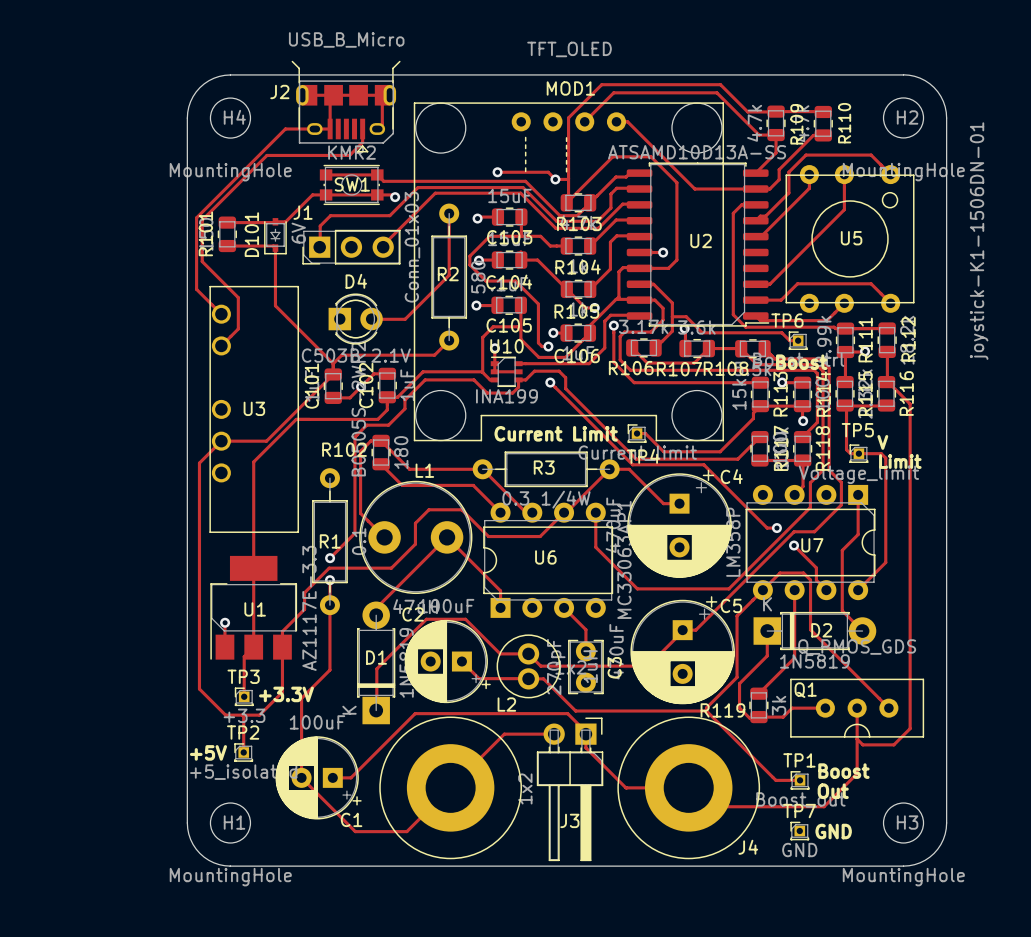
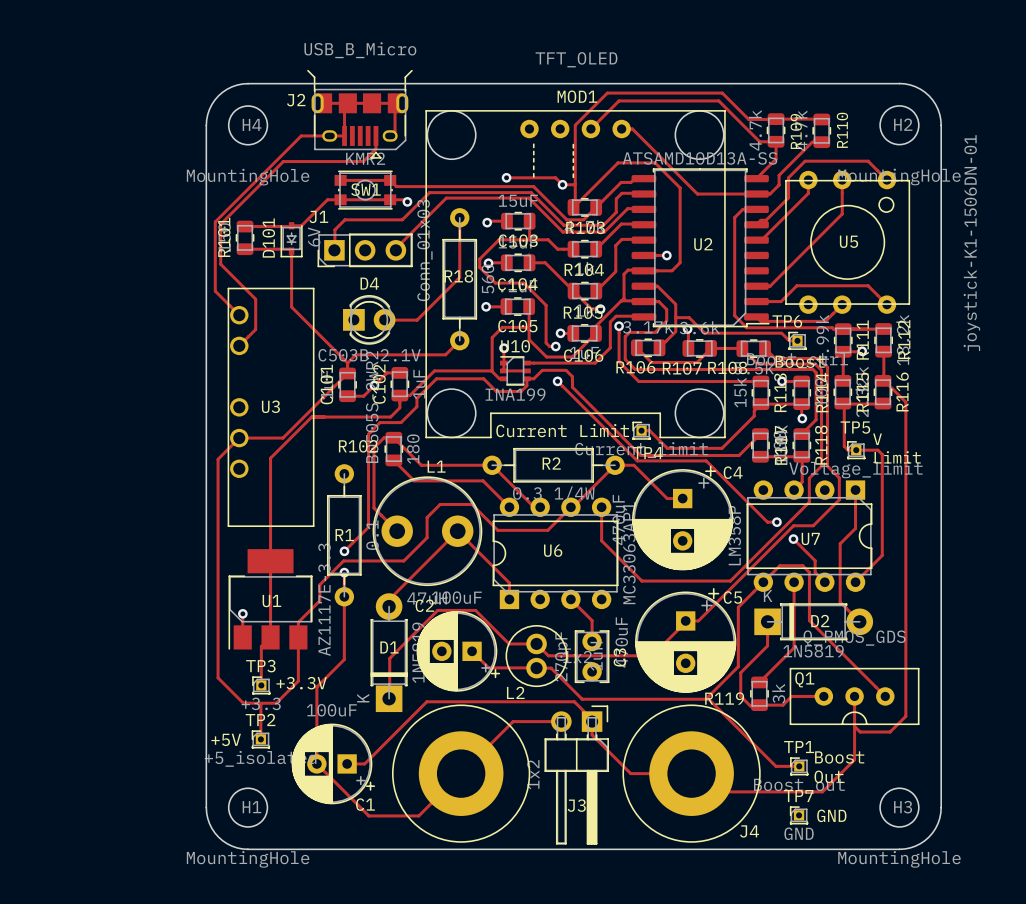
R2 name: R2 (448, 274) -> R18 (458, 276)
R2 value: 580 (478, 277) -> 560 (487, 279)
R3 name: R3 (544, 467) -> R2 (551, 463)

